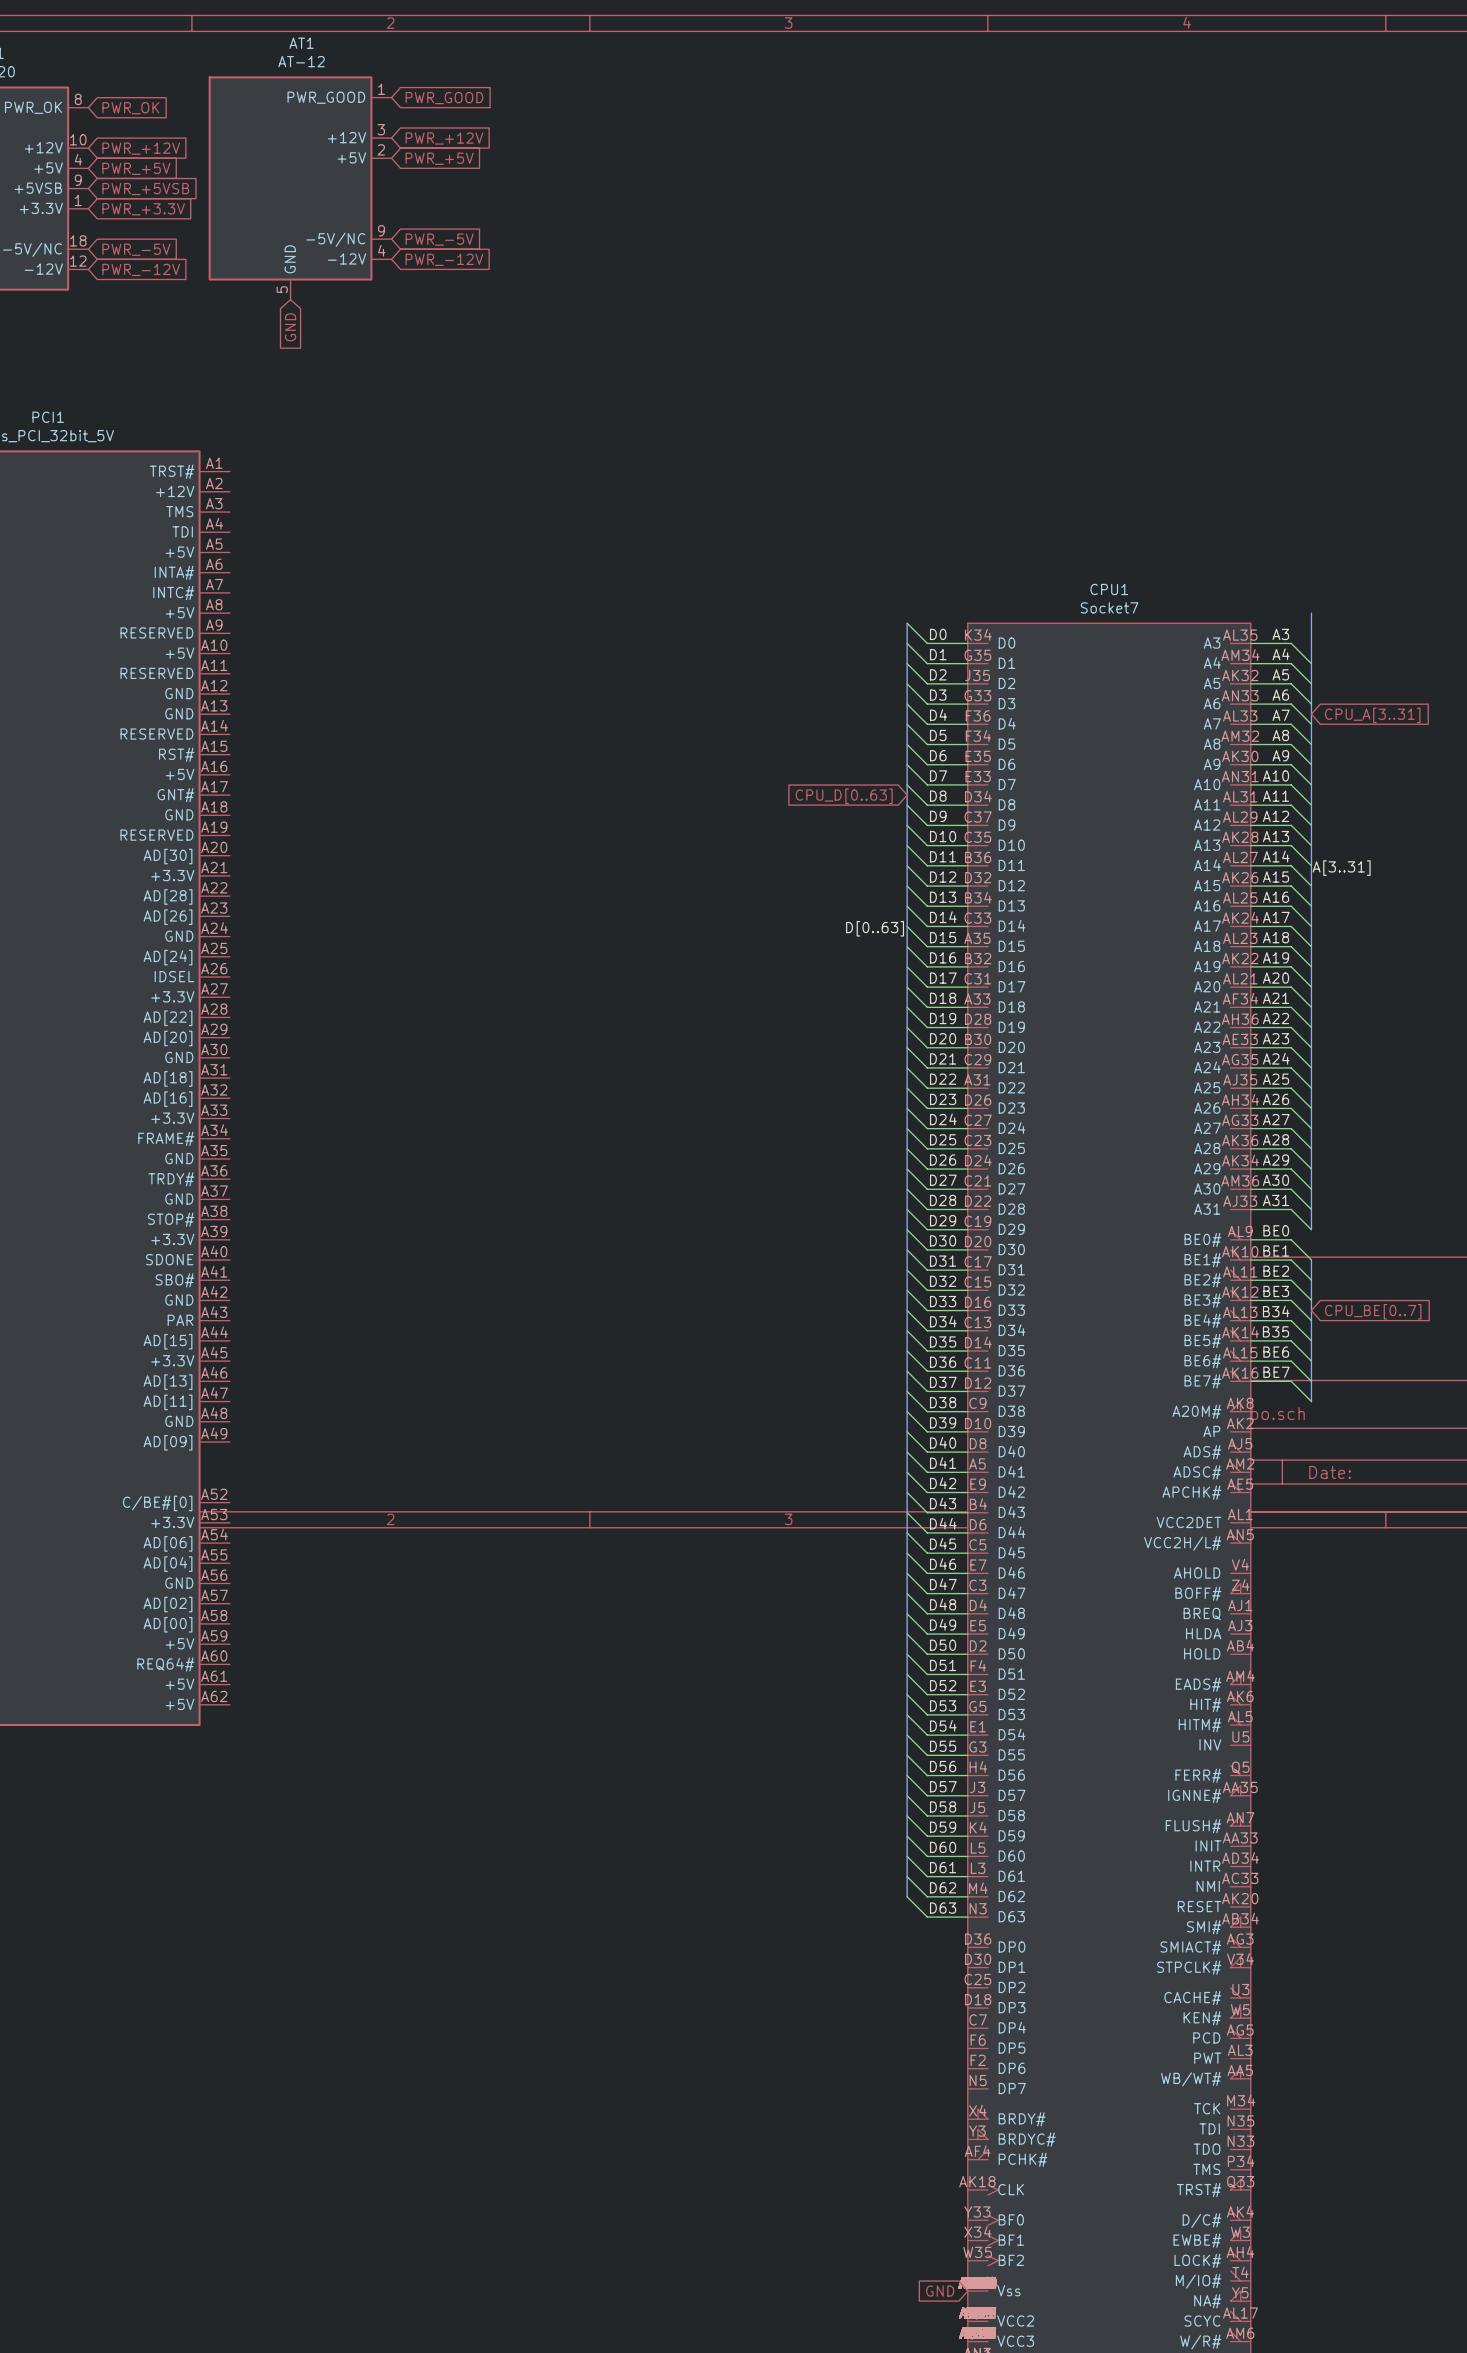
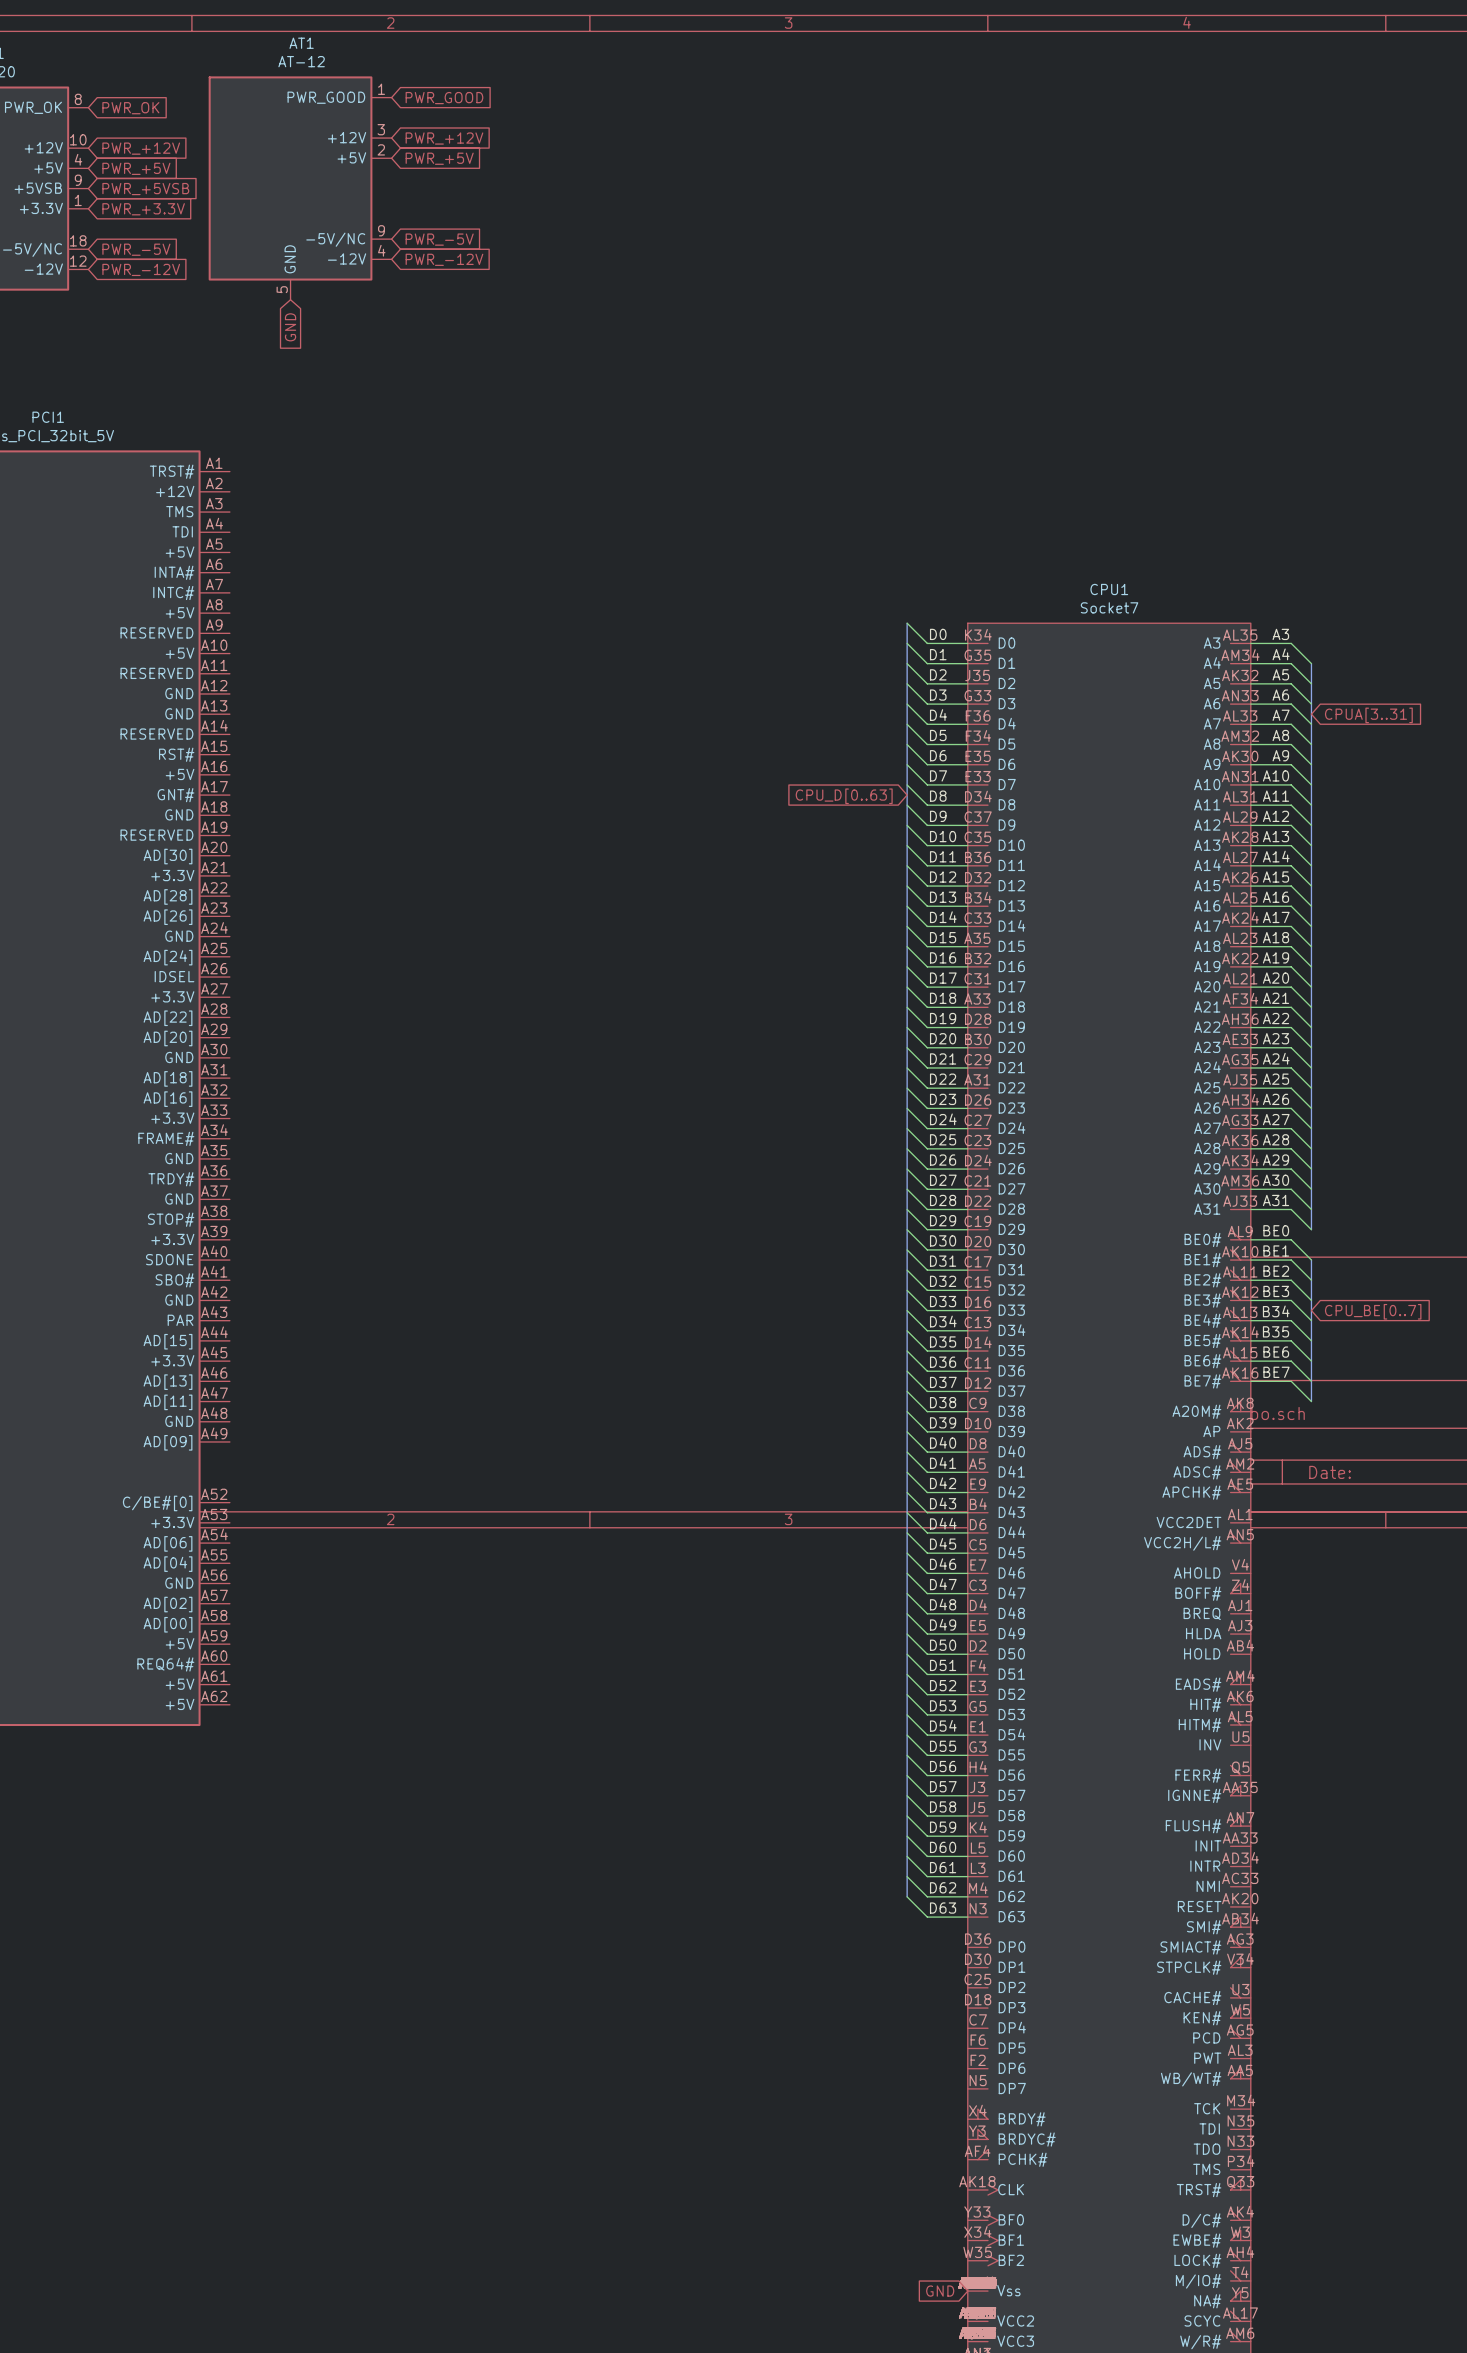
bus: (1311, 613) (1311, 663) -> none
global label: CPU_A[3..31] (1372, 715) -> CPUA[3..31] (1368, 715)
label: A[3..31] (1341, 868) -> none
label: D[0..63] (875, 928) -> none

